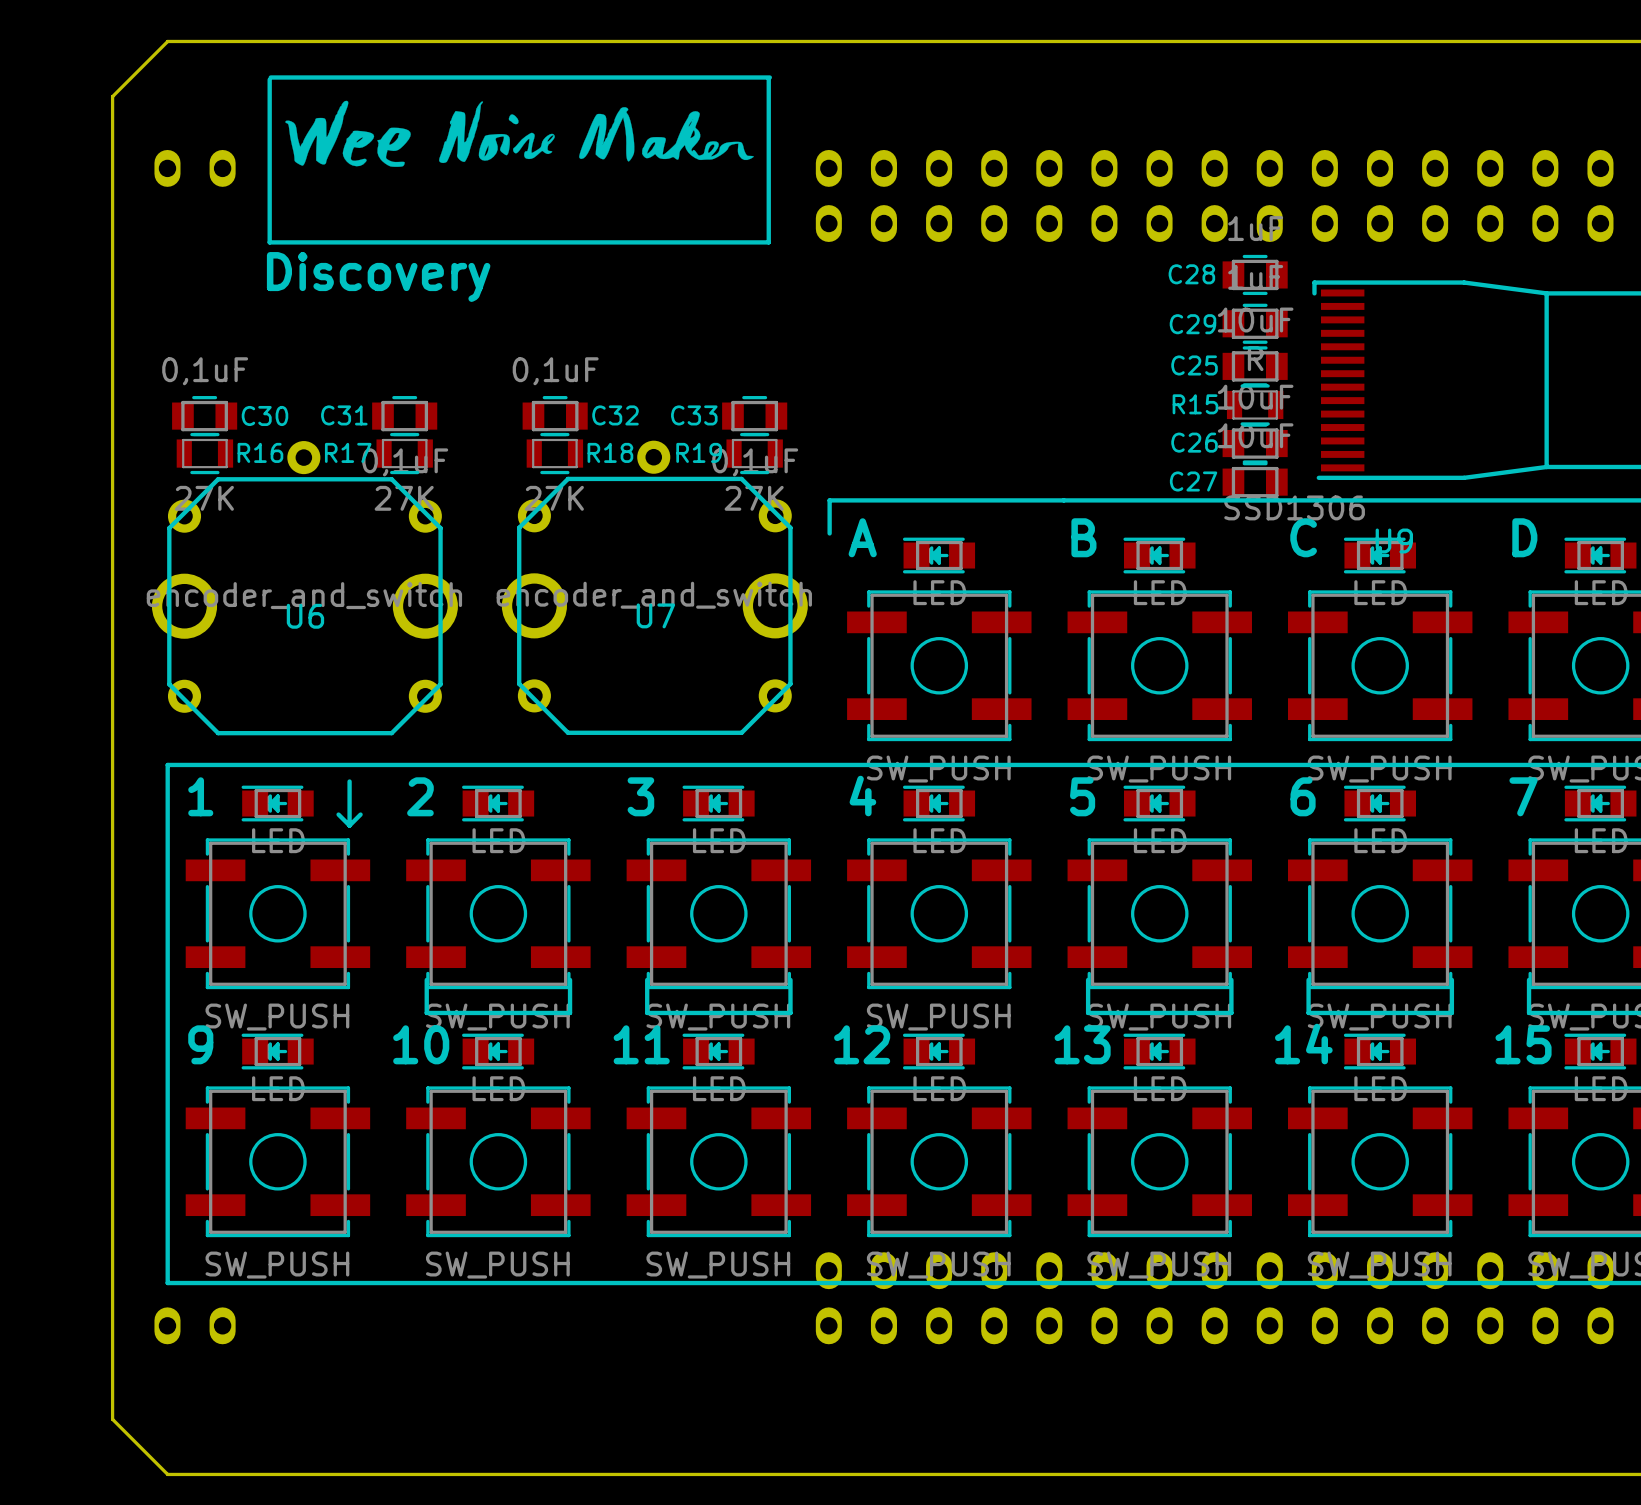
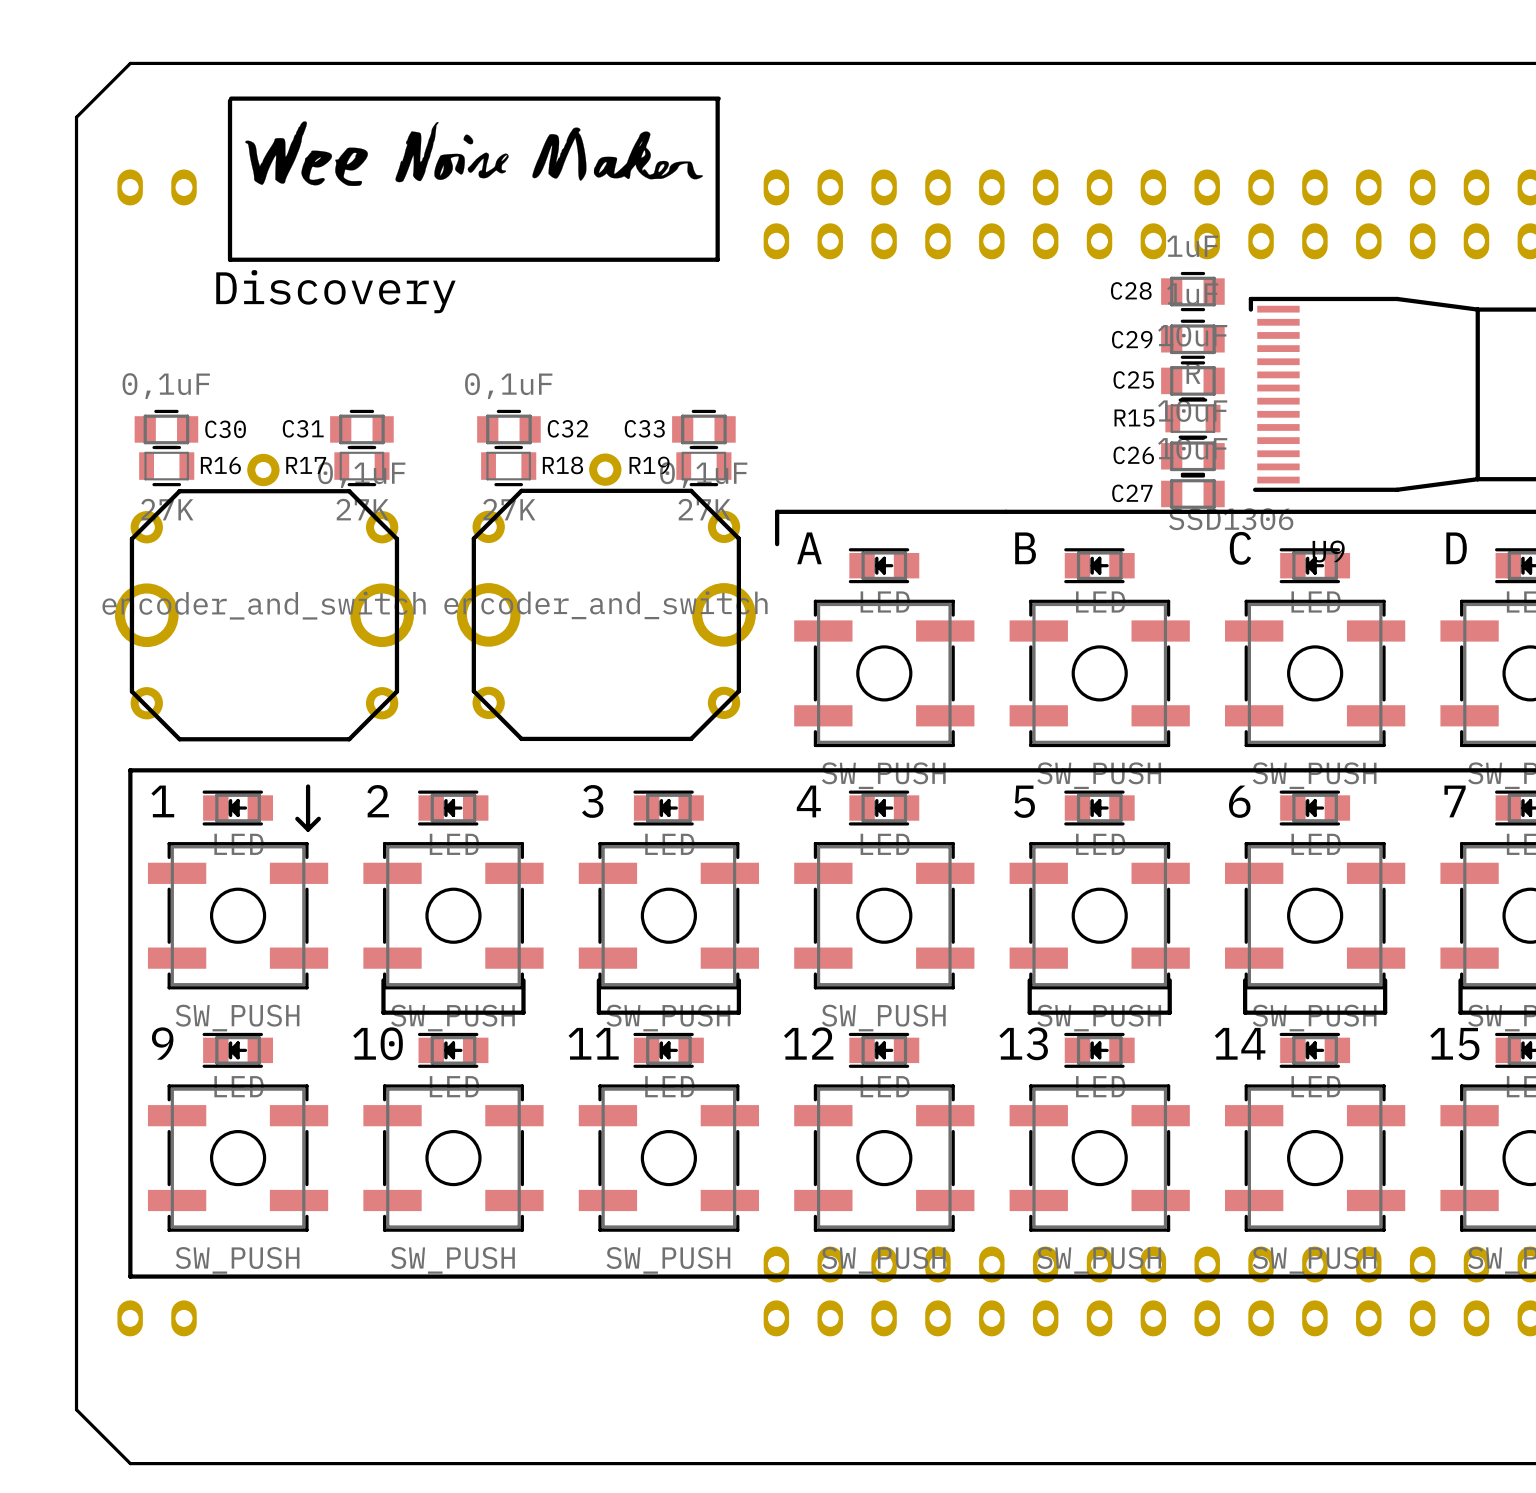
U7 name: U7 (655, 615) -> none
U6 name: U6 (305, 616) -> none

